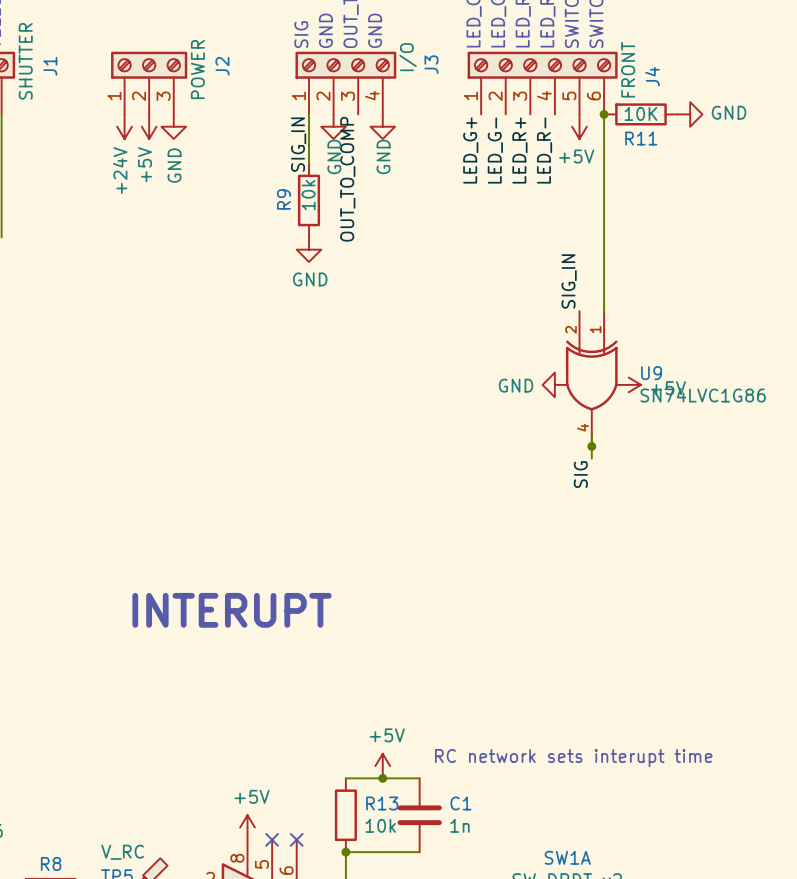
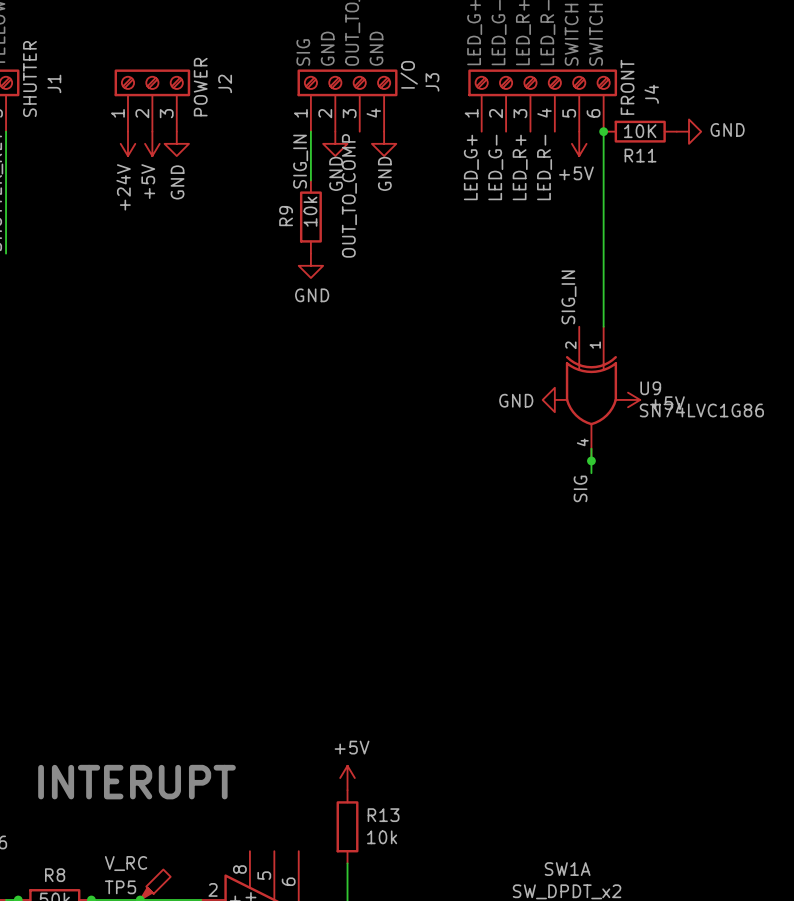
text position: INTERUPT (232, 610) -> INTERUPT (137, 782)
text: RC network sets interupt time (573, 758) -> none
power symbol position: +5V (382, 766) -> +5V (347, 778)
wire: (345, 778) (419, 778) -> none
junction: (382, 778) -> none
C1: 1n (419, 815) -> none
power symbol: +5V (247, 827) -> none
no-connect mark: (272, 839) -> none
no-connect mark: (296, 839) -> none
wire: (345, 852) (419, 852) -> none
junction: (345, 852) -> none

